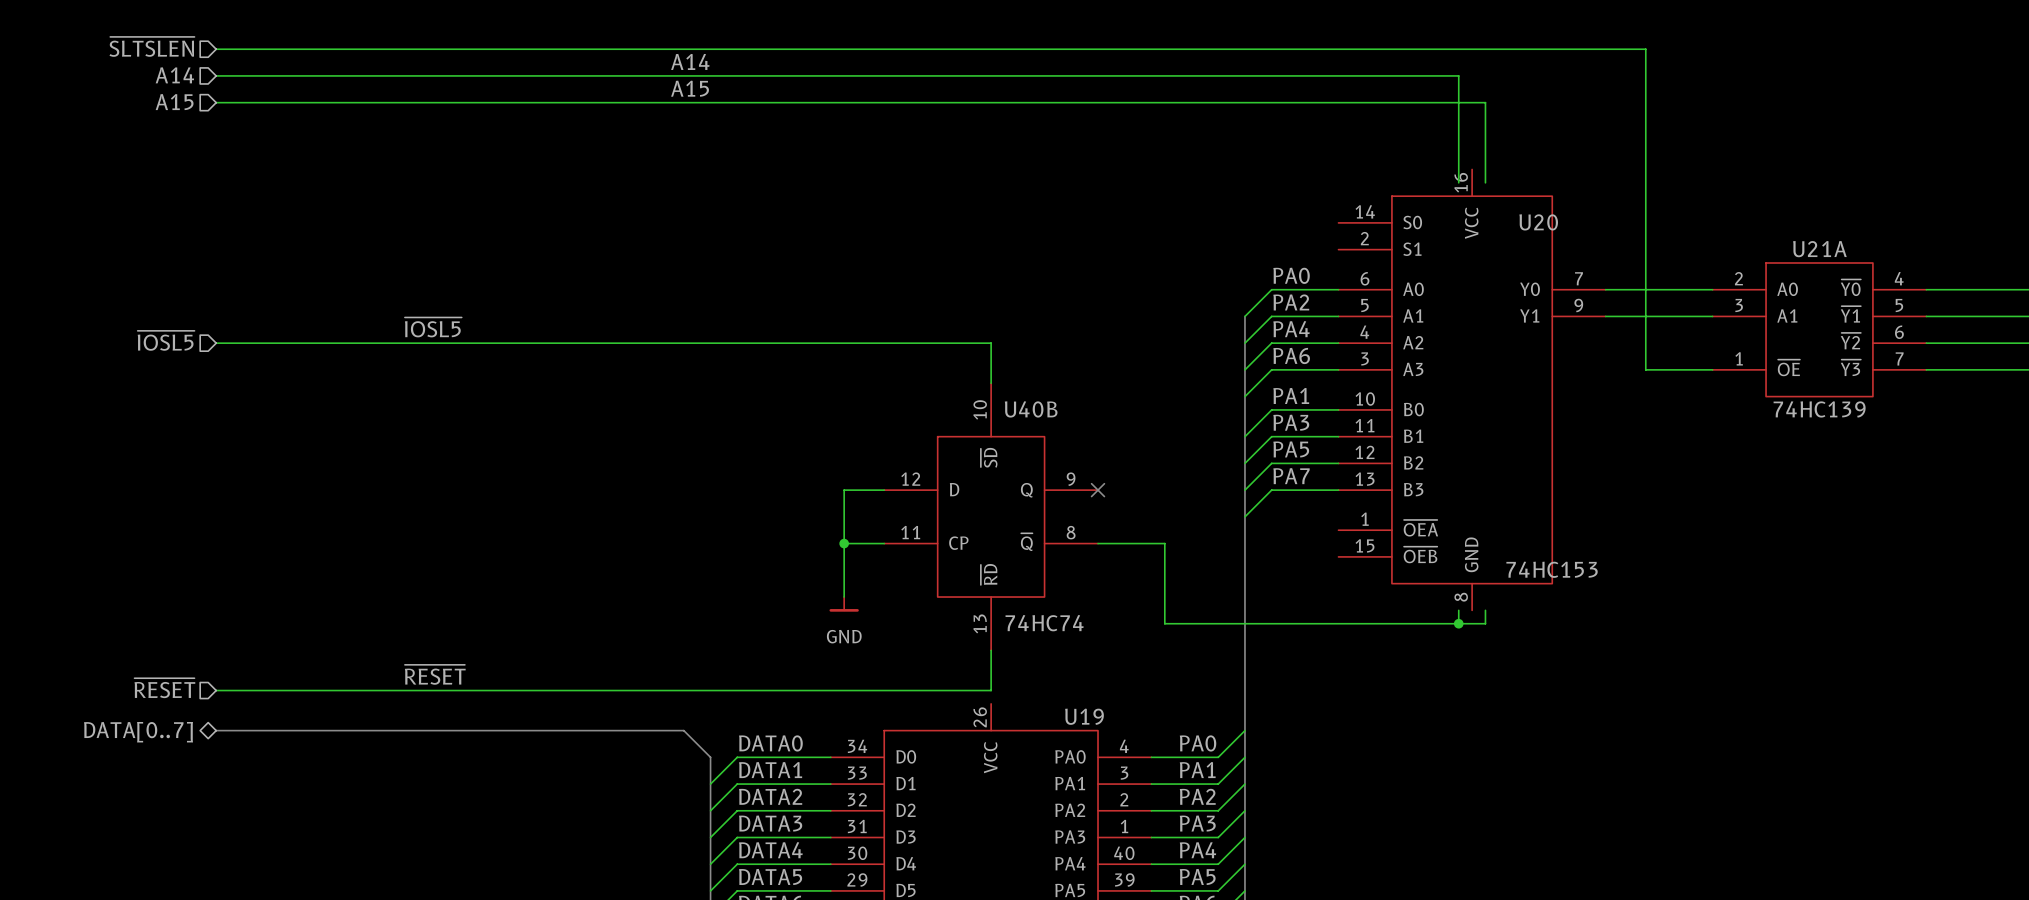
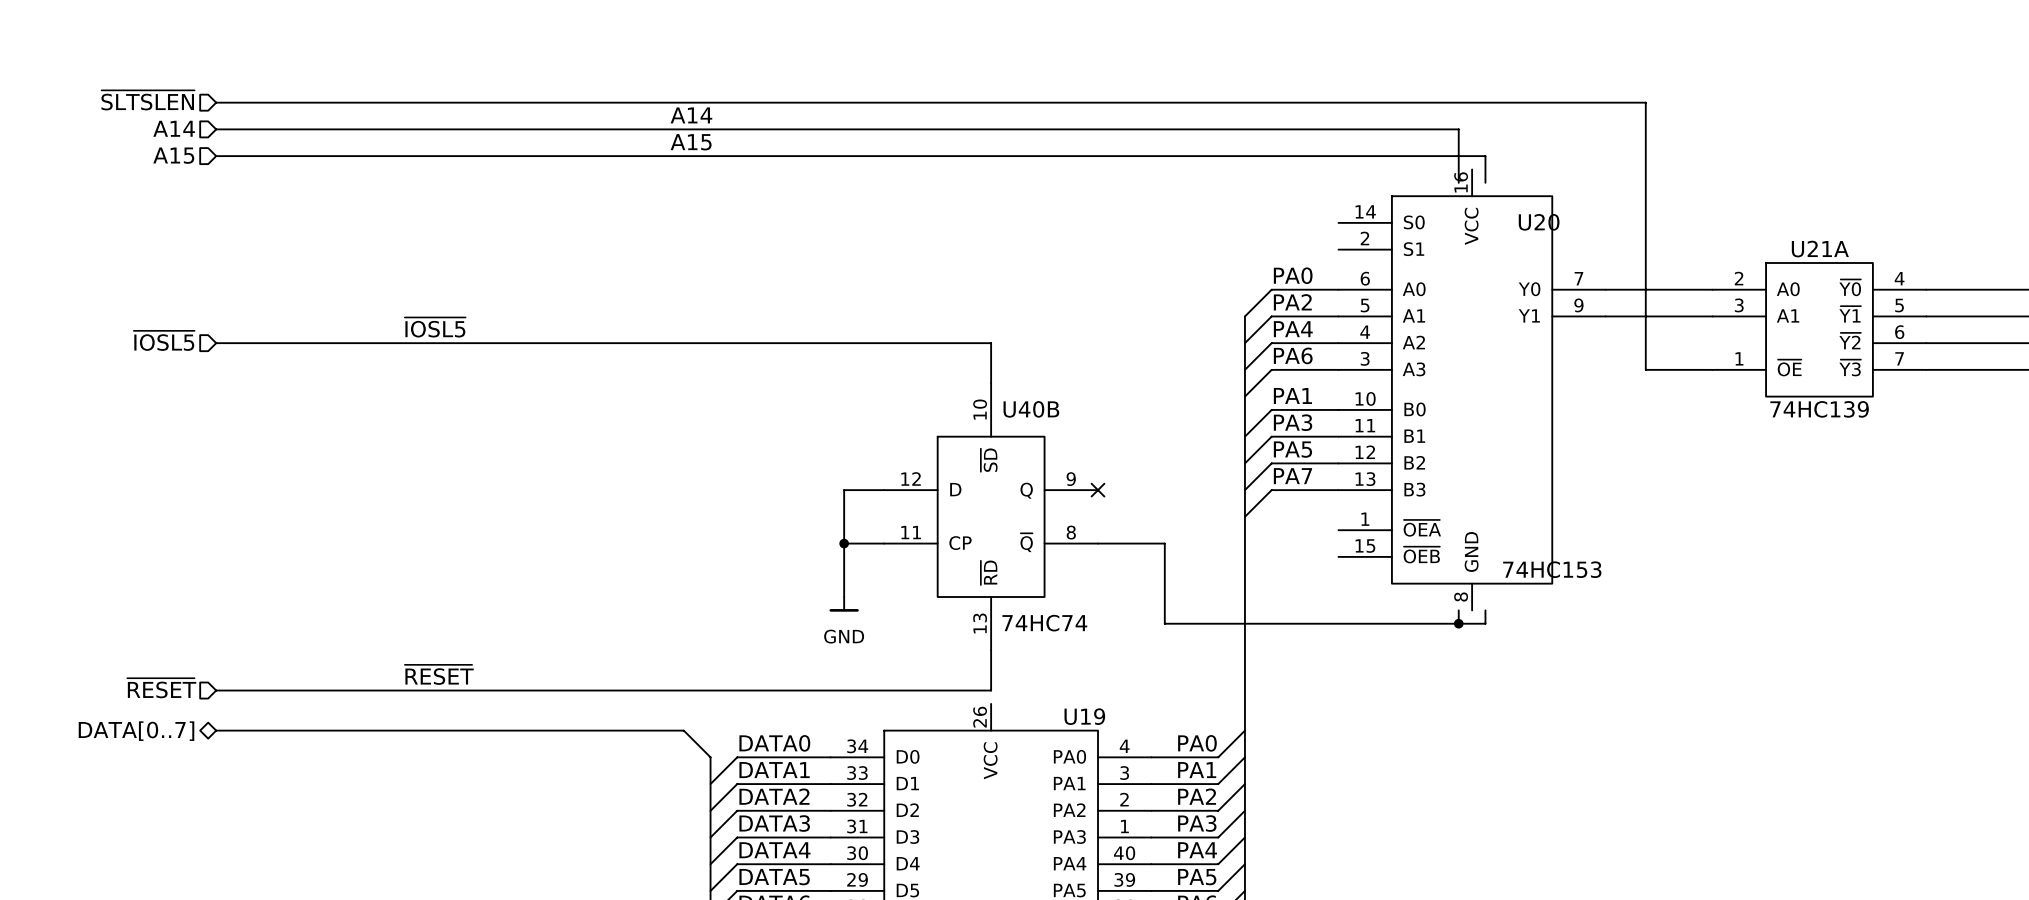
hierarchical label: ~{SLTSLEN} (152, 46) -> none
wire: (216, 49) (1645, 49) (1645, 102) -> none
label position: A14 (690, 61) -> A14 (691, 115)
hierarchical label position: A14 (174, 75) -> A14 (174, 128)
wire: (216, 75) (1458, 75) (1458, 129) -> (216, 129) (1458, 129)
label position: A15 (690, 88) -> A15 (691, 142)
hierarchical label: A15 (174, 102) -> ~{SLTSLEN} (147, 100)
wire: (1485, 102) (1485, 156) -> (1485, 102) (1645, 102)
hierarchical label: none -> A15 (173, 155)
wire: none -> (216, 156) (1485, 156)

